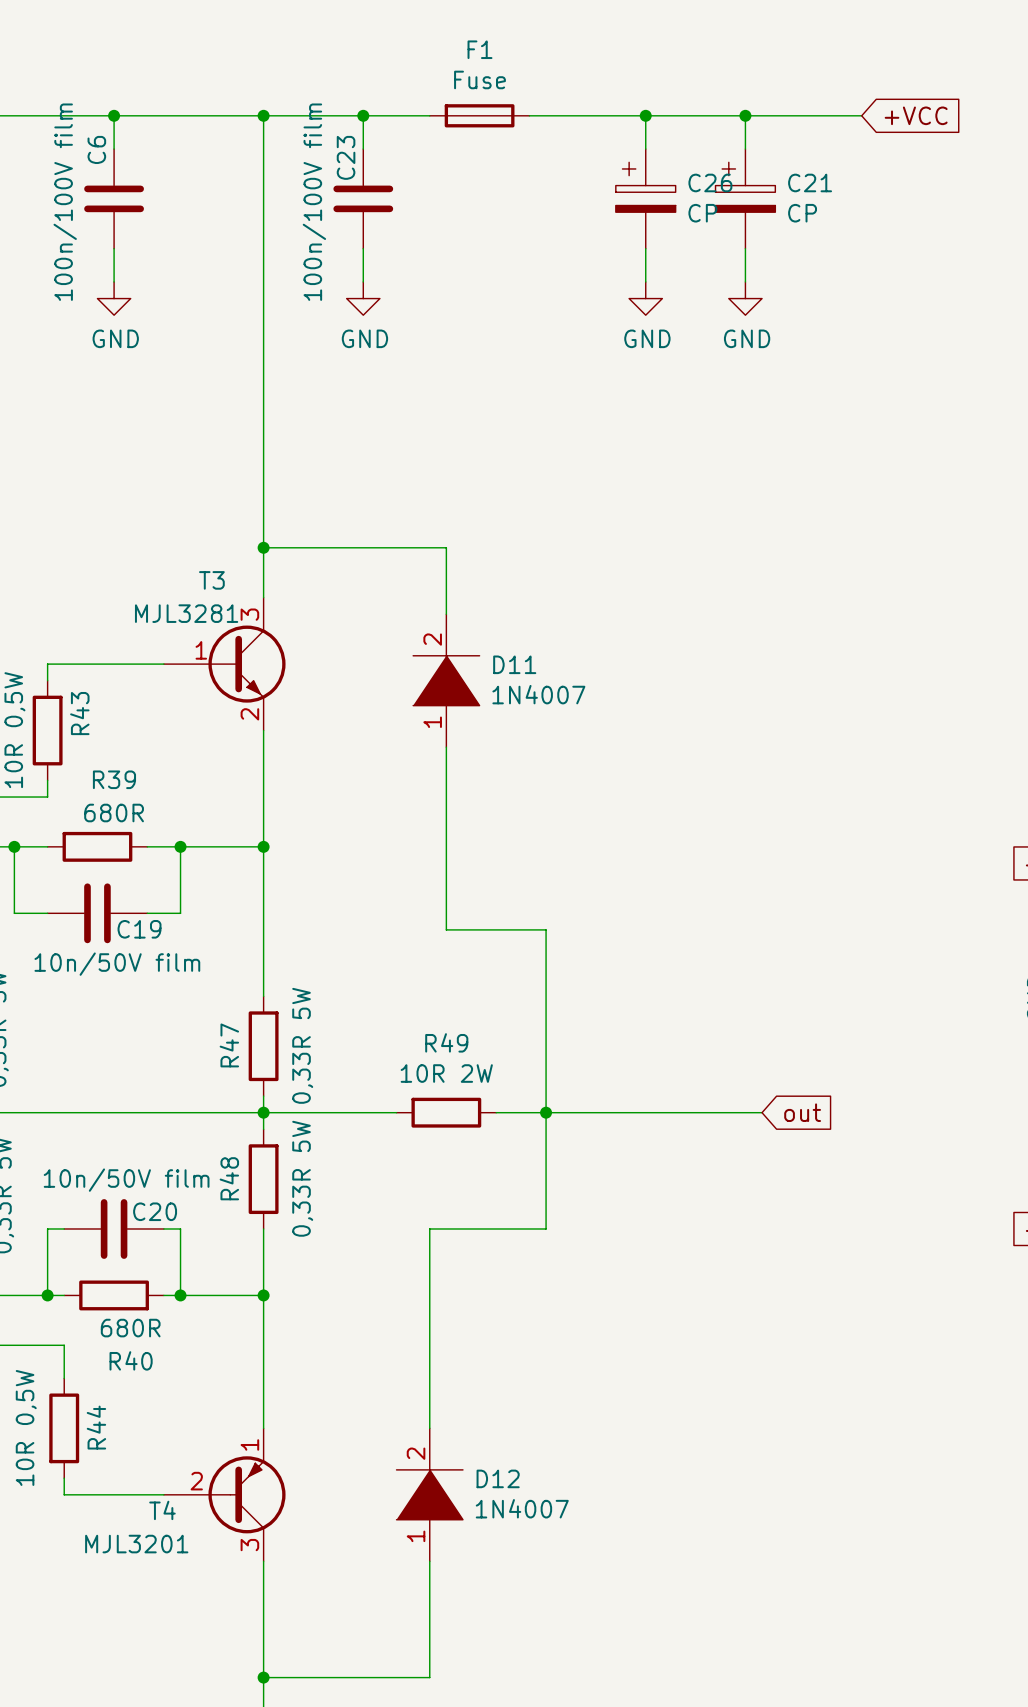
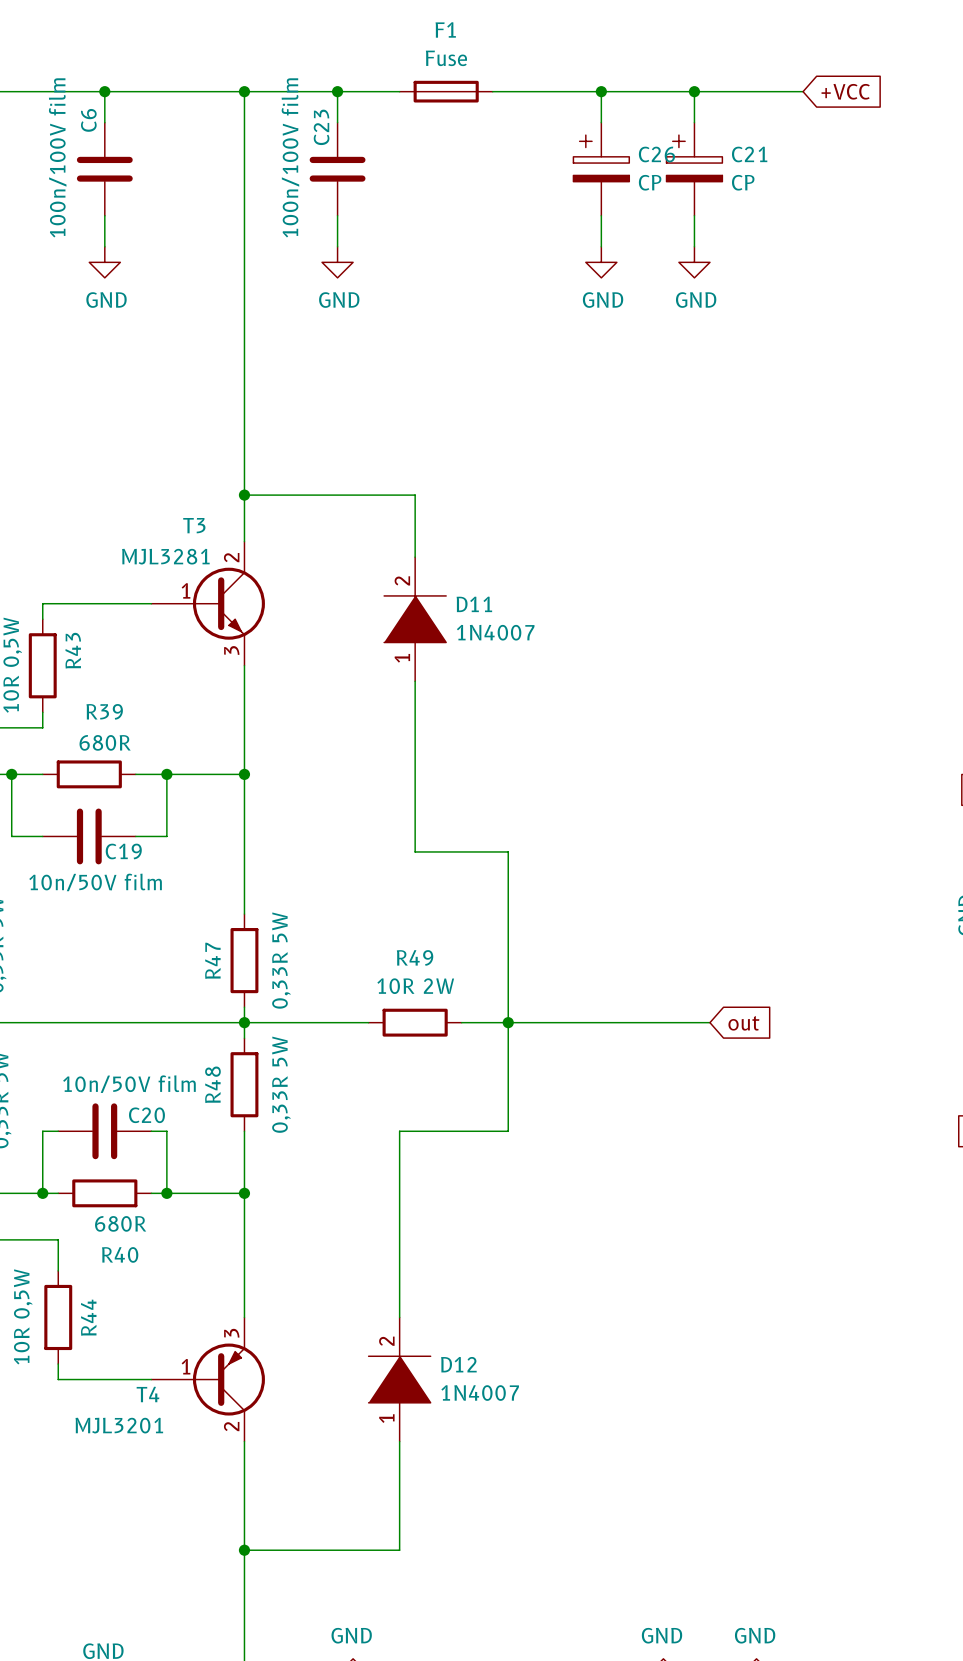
T3 pin number: 3 (249, 614) -> 2 (231, 557)
T3 pin number: 2 (249, 714) -> 3 (231, 650)
T4 symbol: [163, 1428, 286, 1562] -> [151, 1317, 265, 1442]

